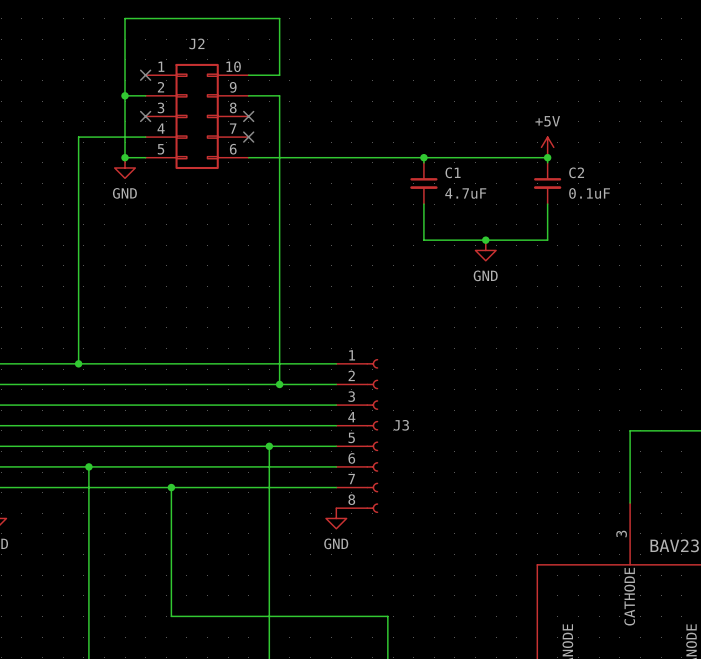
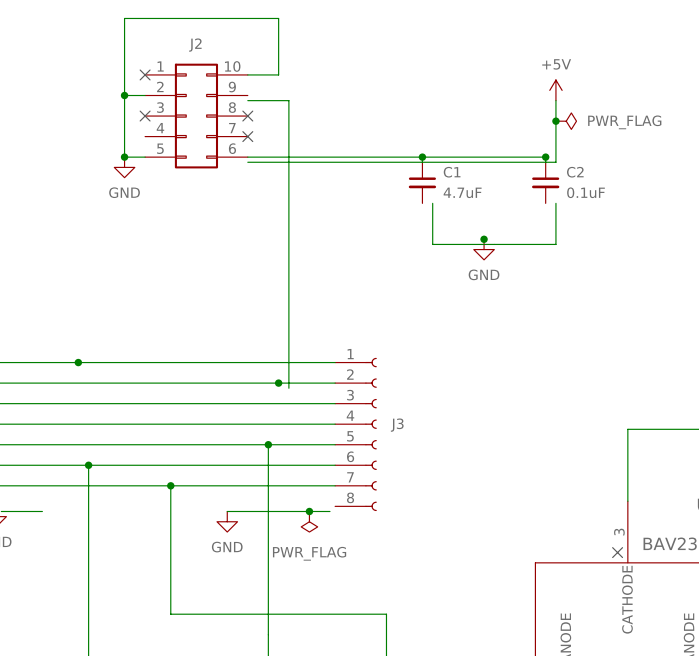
wire: (248, 95) (279, 95) (279, 384) -> none
wire: none -> (247, 100) (288, 100) (288, 388)
wire: none -> (555, 100) (555, 162) (247, 162)
junction: none -> (555, 121)
power symbol: none -> PWR_FLAG (566, 121)
wire: (145, 137) (78, 137) (78, 363) -> none
power symbol position: +5V (547, 147) -> +5V (555, 90)
wire: (423, 204) (423, 240) (547, 240) (547, 204) -> none
wire: none -> (432, 203) (432, 244) (555, 244) (555, 203)
wire: none -> (1, 511) (42, 511)
wire: none -> (227, 511) (329, 511)
junction: none -> (309, 511)
power symbol position: GND (336, 518) -> GND (227, 521)
power symbol: none -> PWR_FLAG (309, 521)
no-connect mark: none -> (617, 552)

